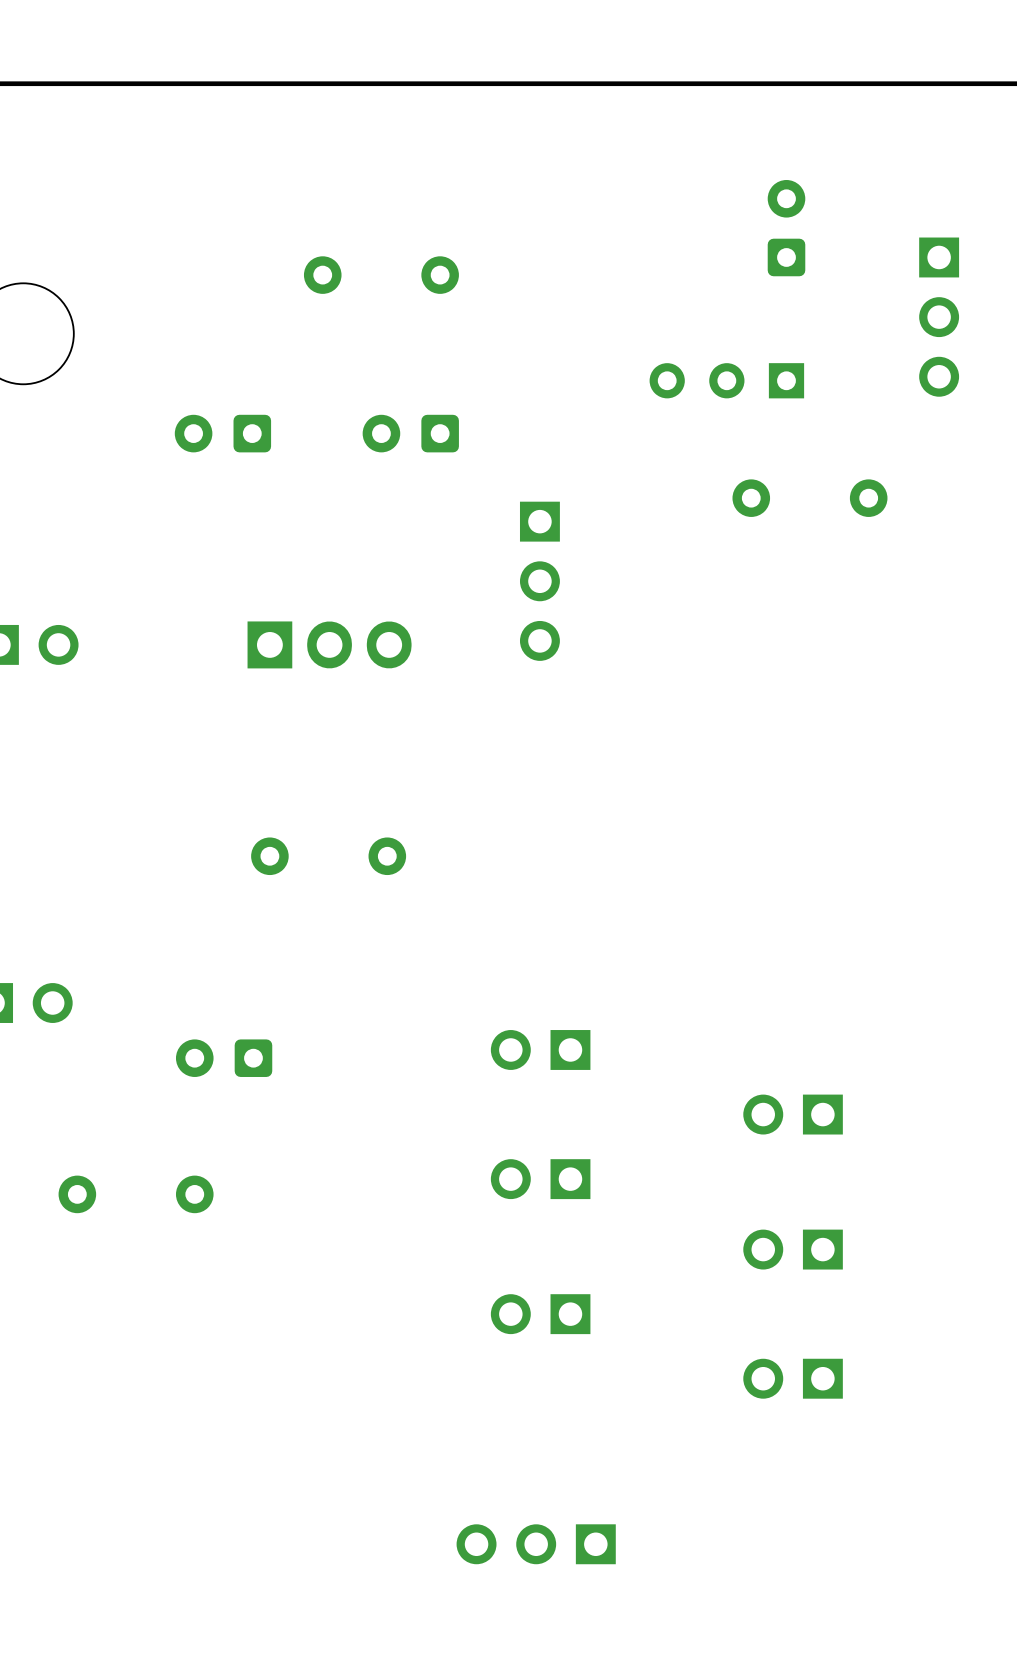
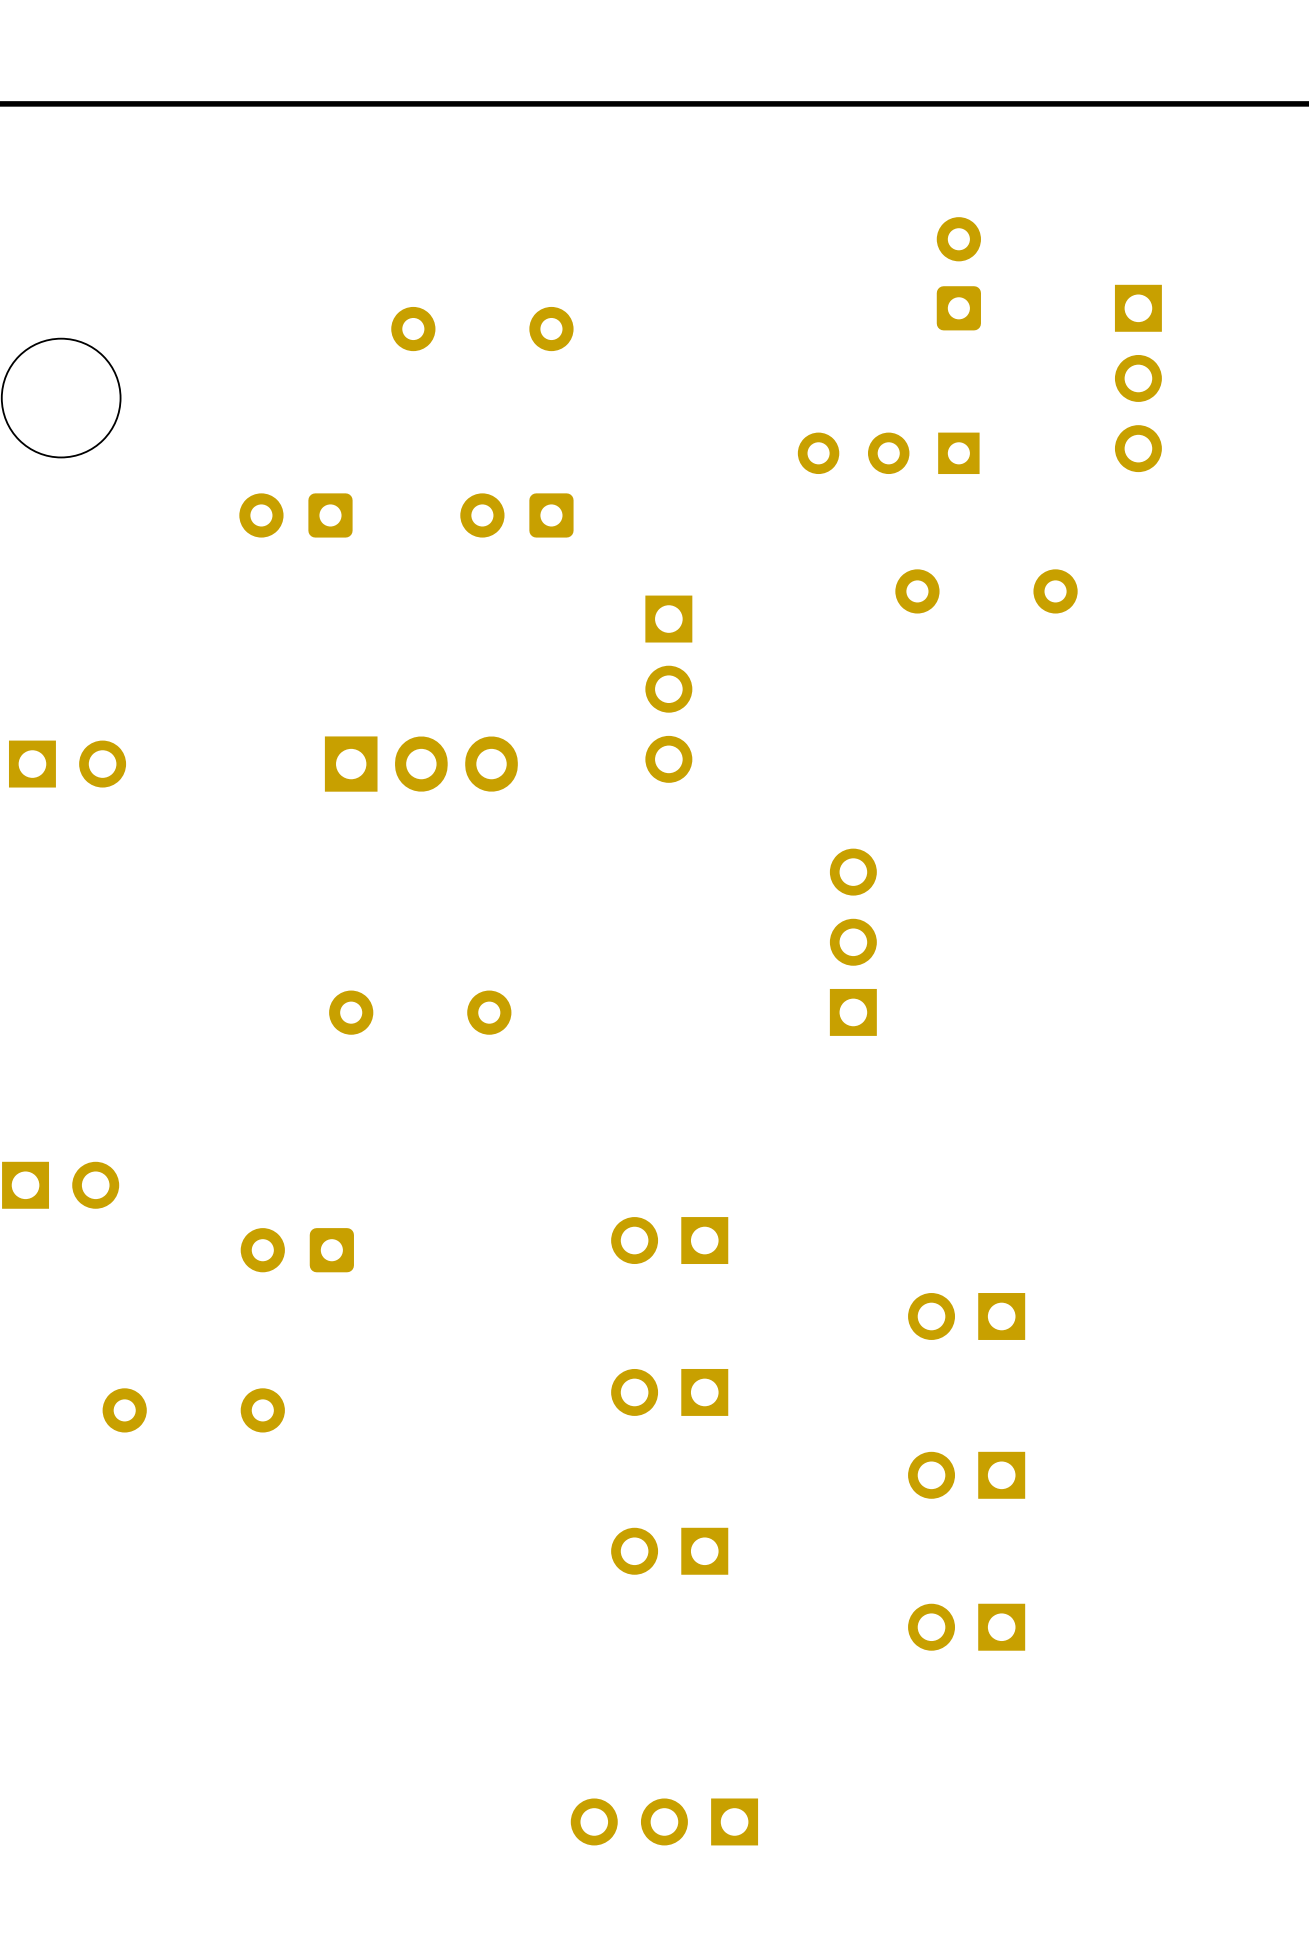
part: none -> (853, 942)

